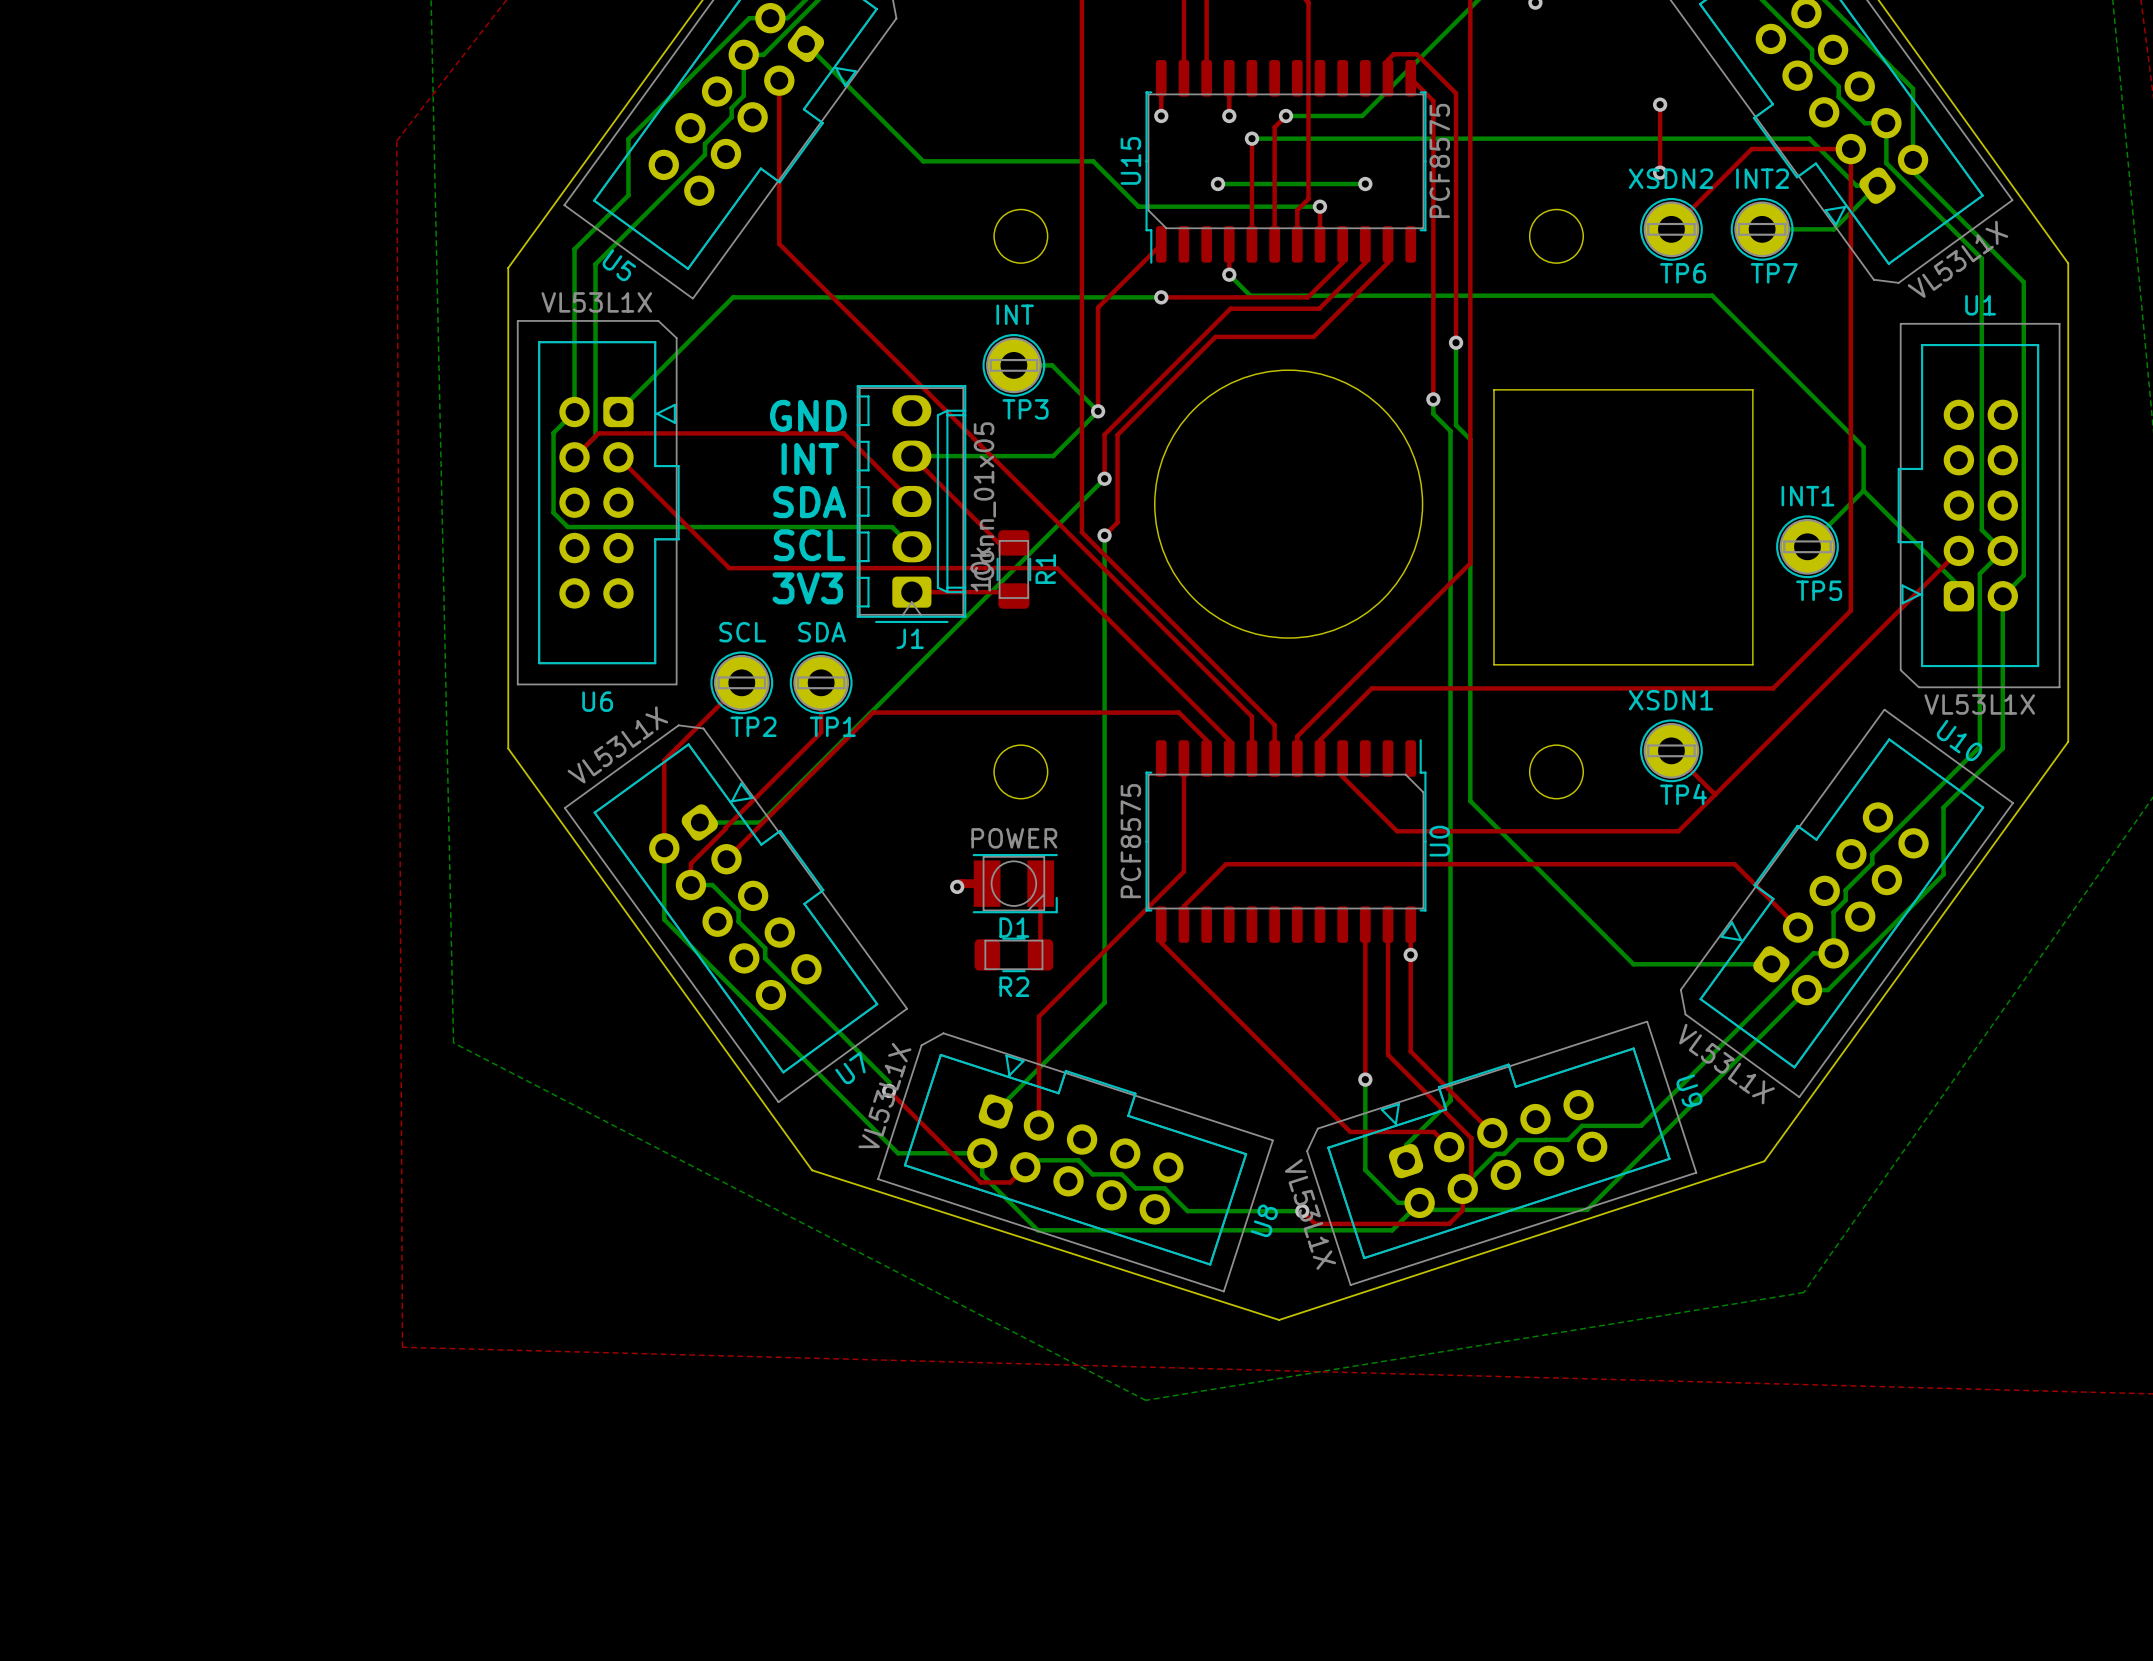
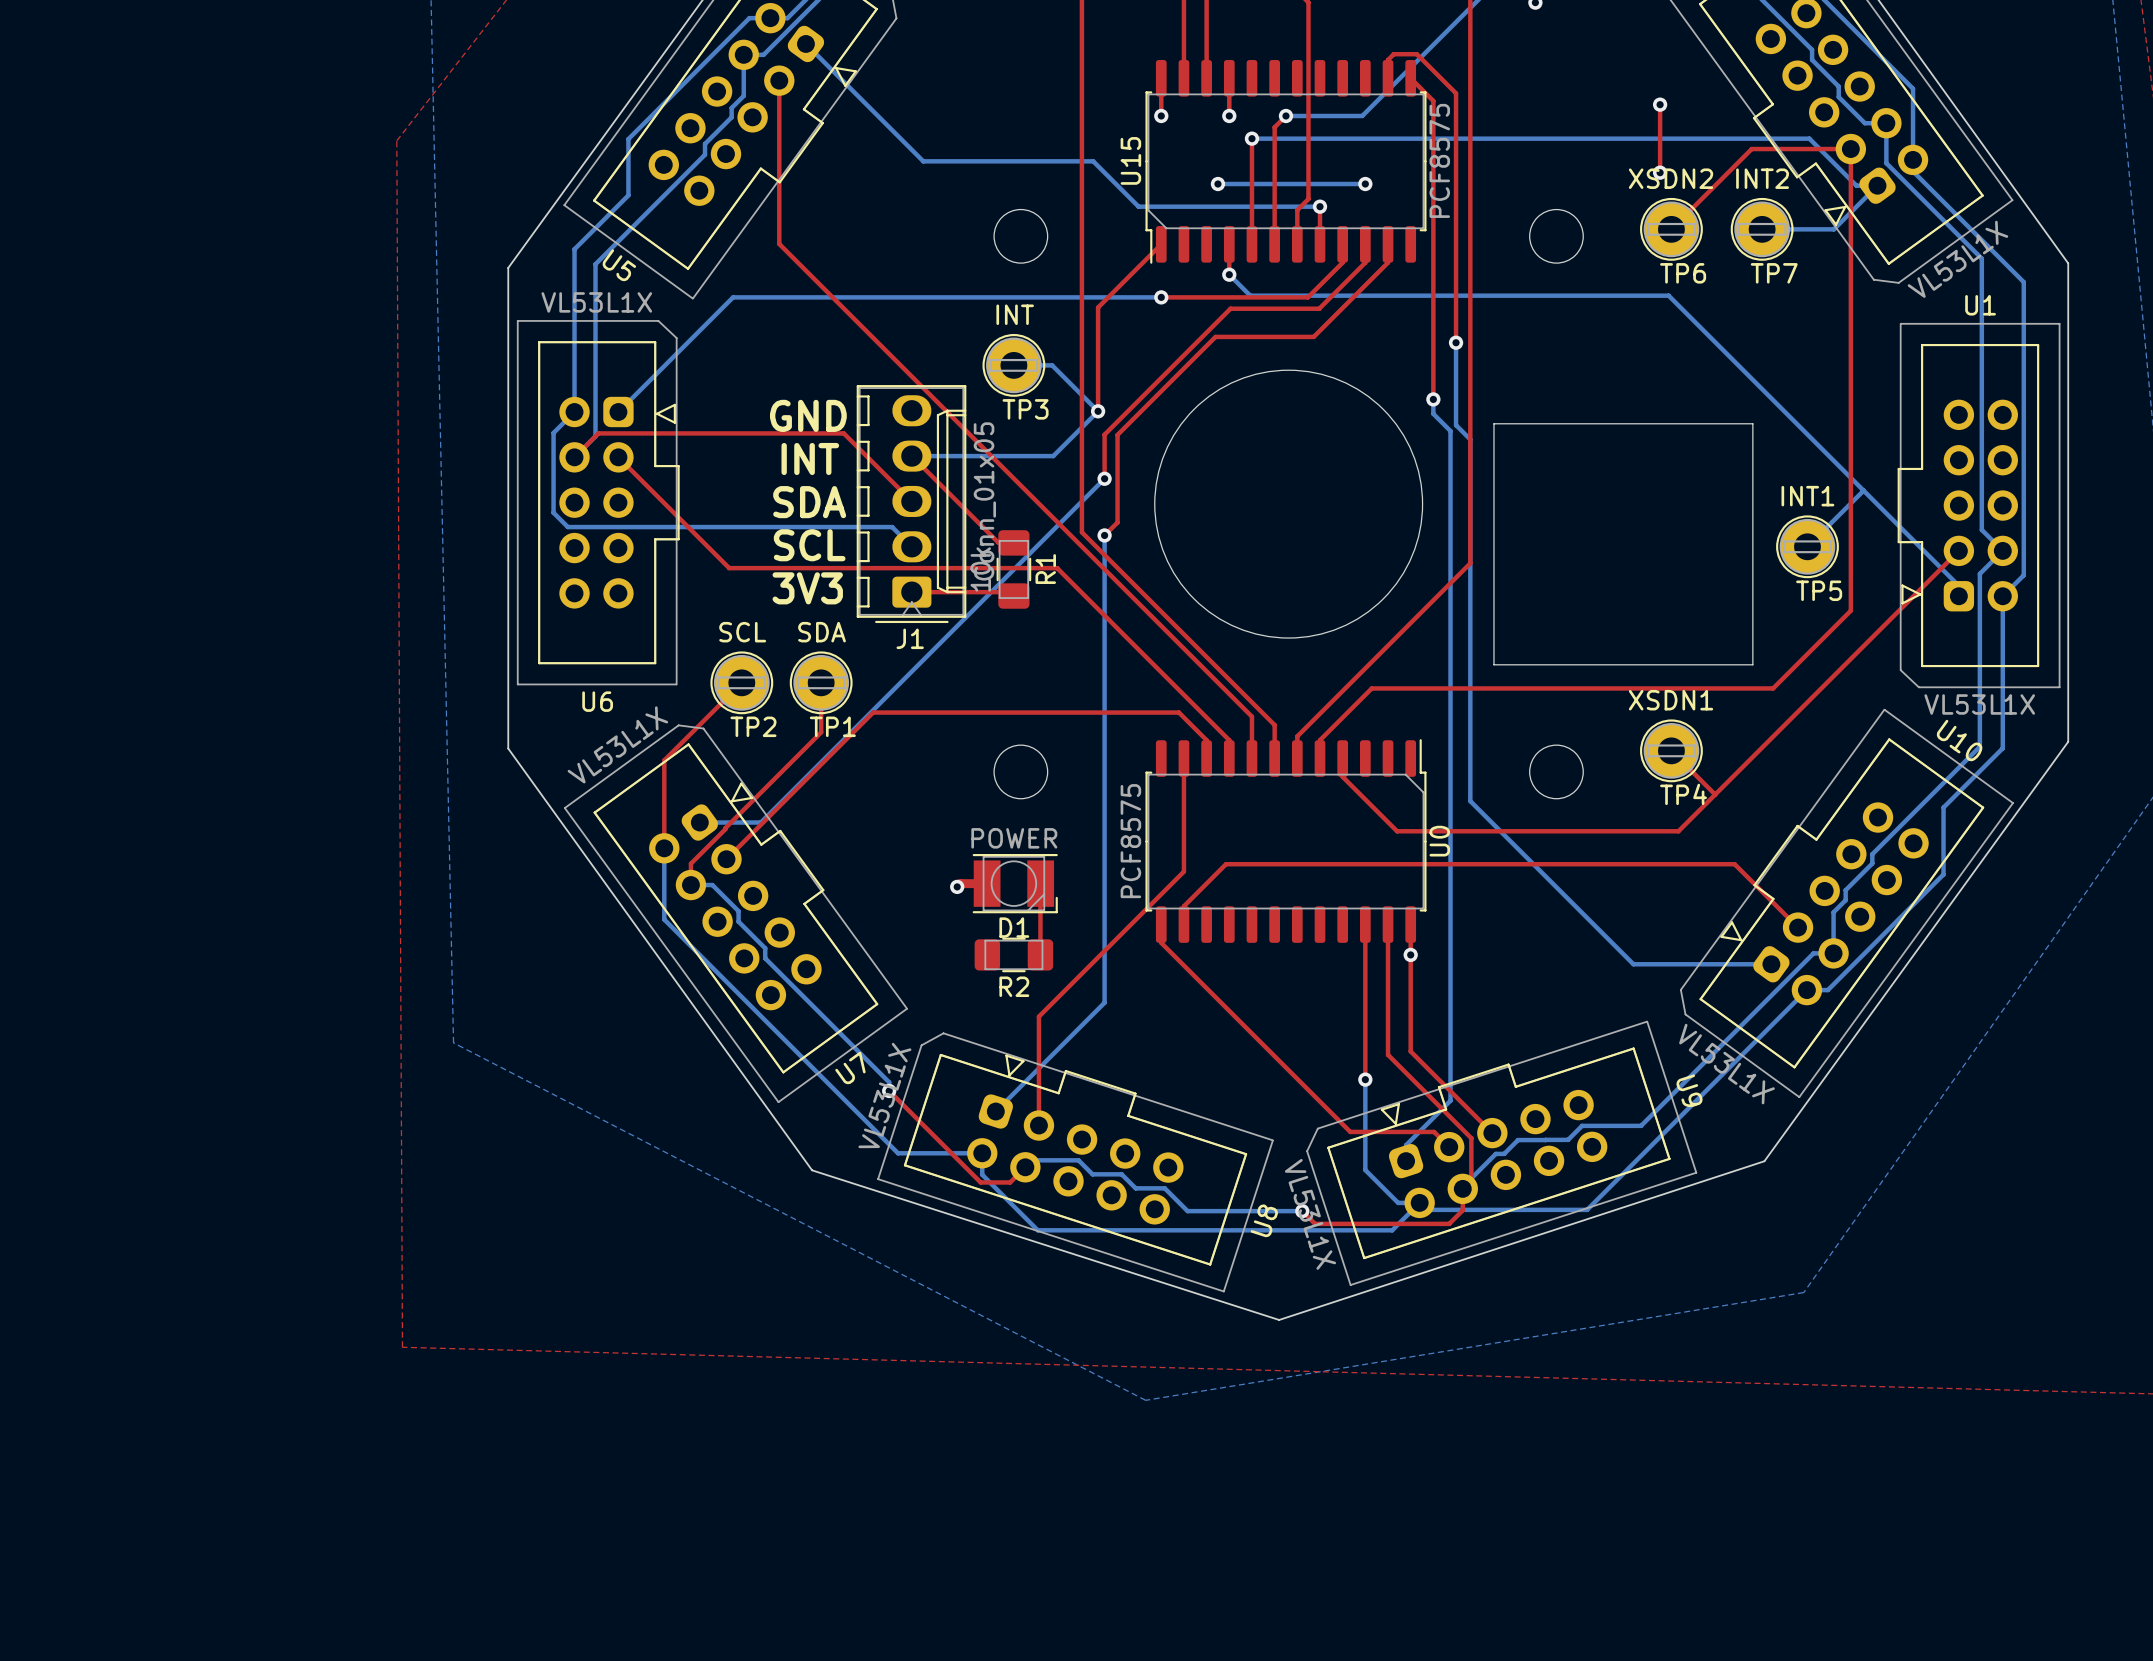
bottom track: (1668, 295) (1712, 295) (1863, 447) (1863, 490) -> (1668, 295) (1863, 490)
board edge: (1493, 423) (1493, 389) (1752, 389) (1752, 423) -> (1493, 423) (1752, 423)

